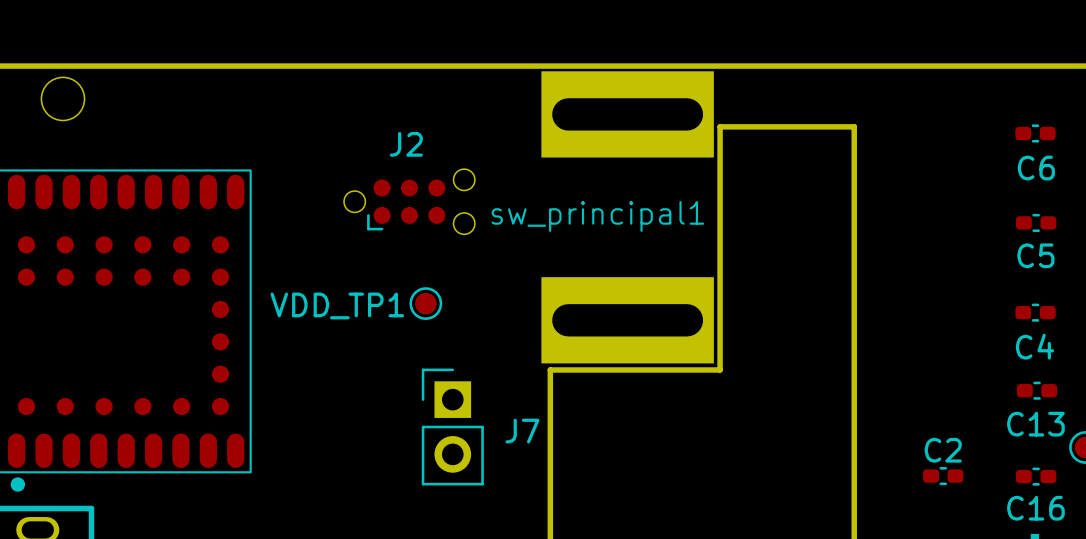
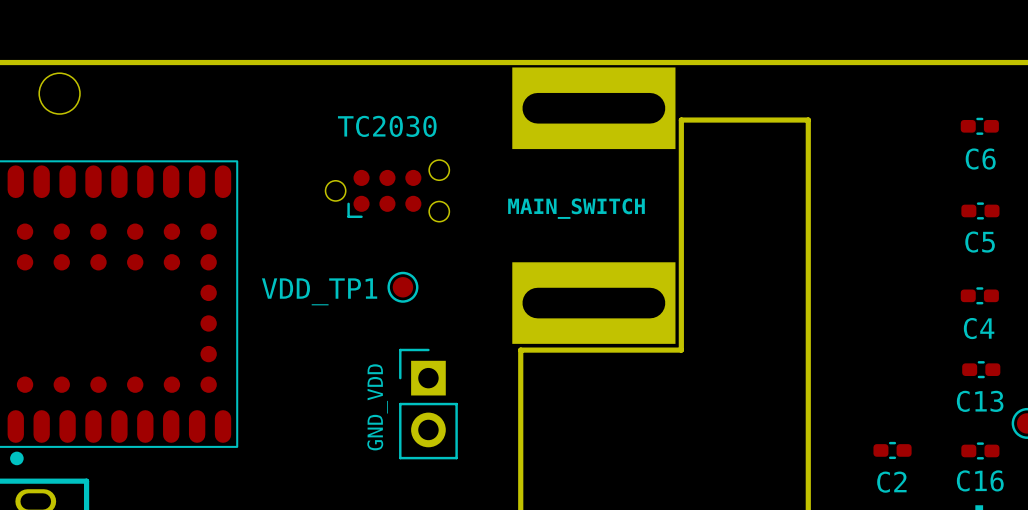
J2 name: J2 (406, 144) -> TC2030 (387, 126)
sw_principal1 name: sw_principal1 (597, 216) -> MAIN_SWITCH (576, 208)
J7 name: J7 (522, 431) -> GND_VDD (377, 407)
C2 name position: C2 (943, 450) -> C2 (891, 482)

